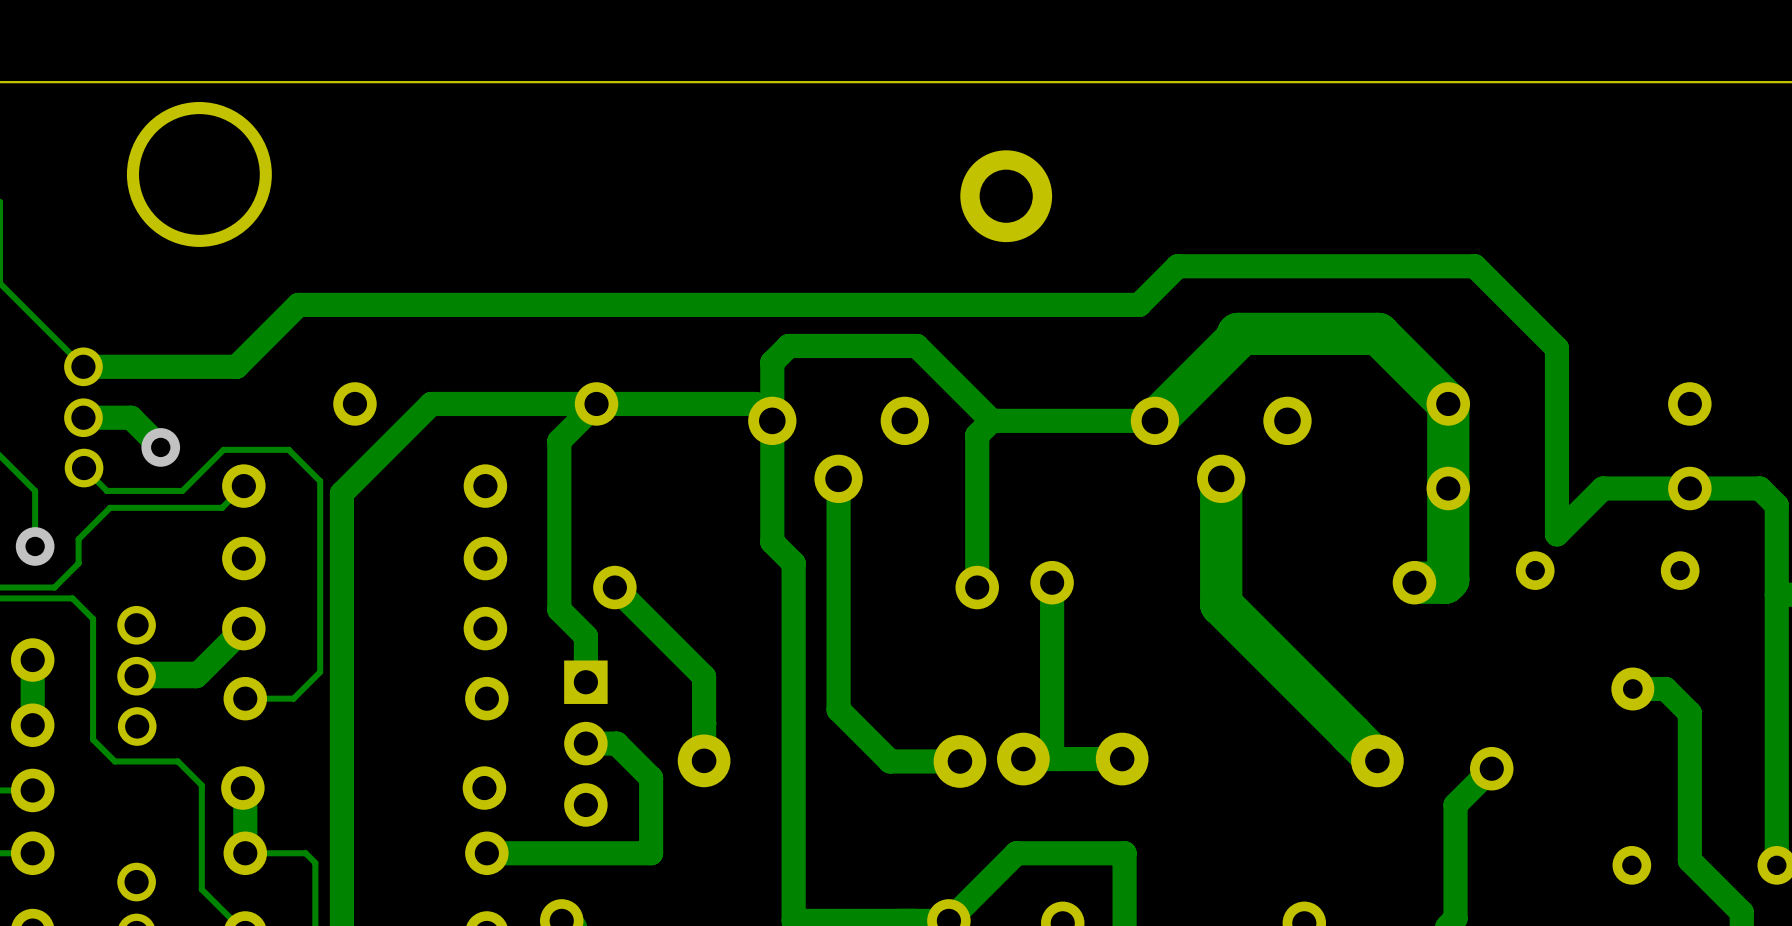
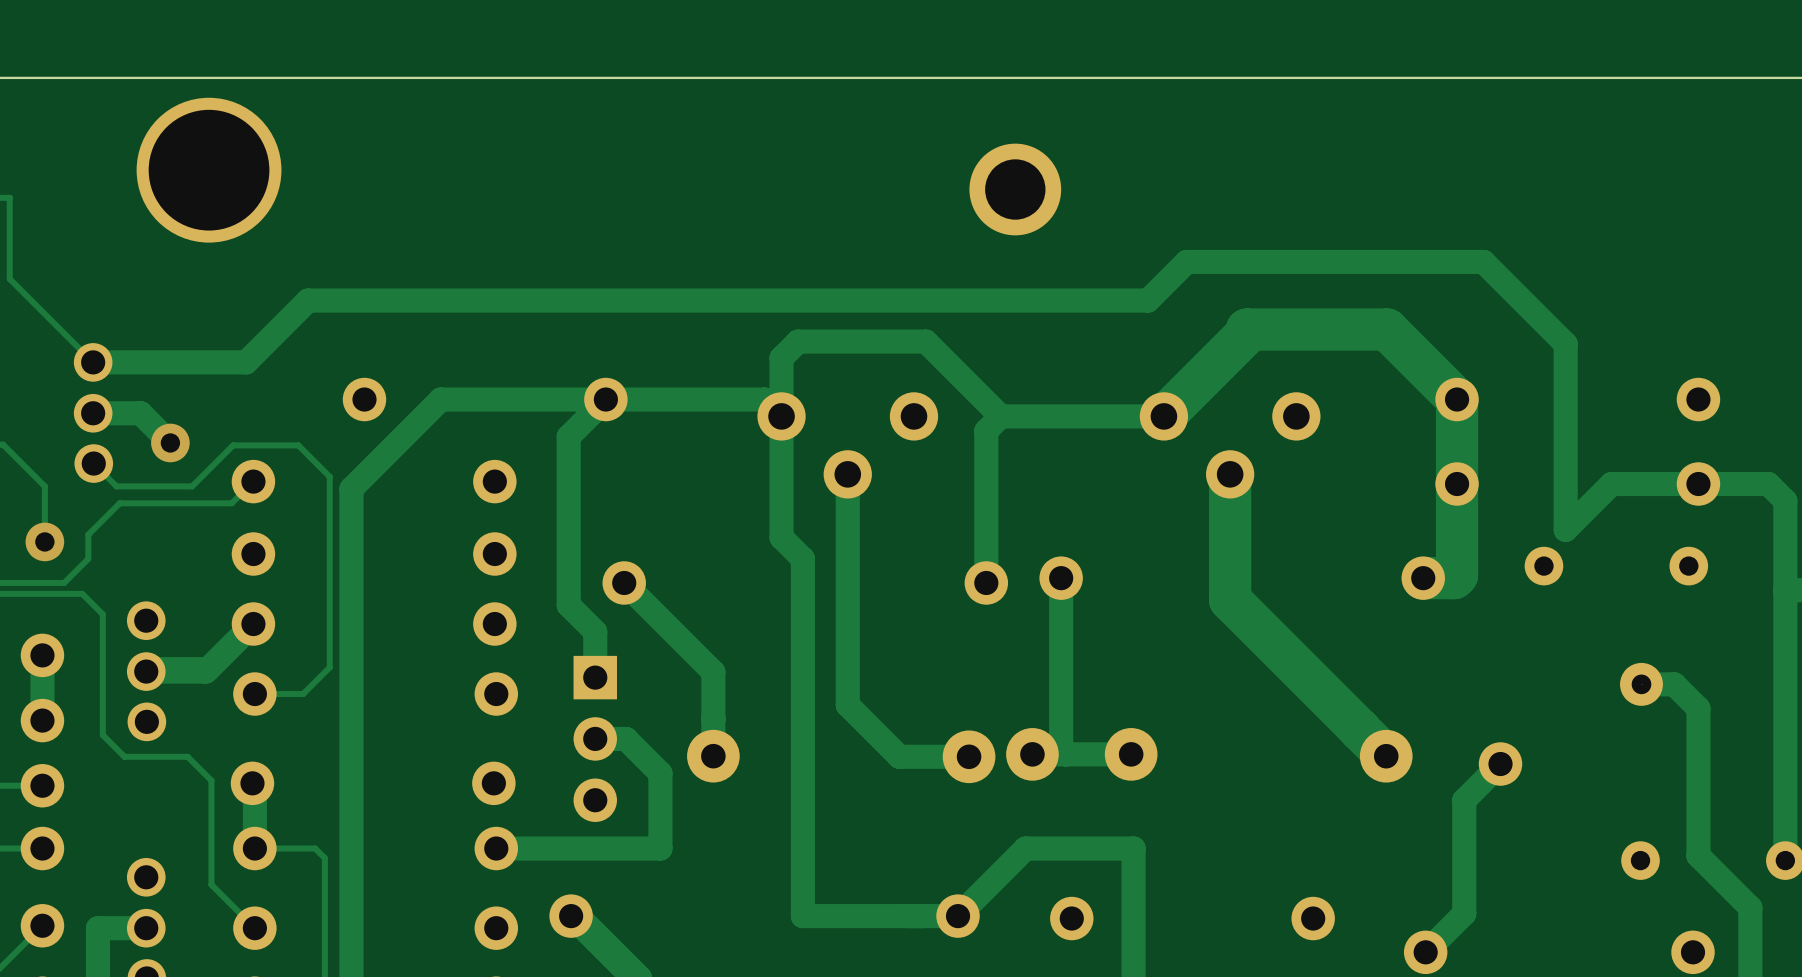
part footprint: [960, 150, 1053, 243] -> [969, 143, 1062, 236]

